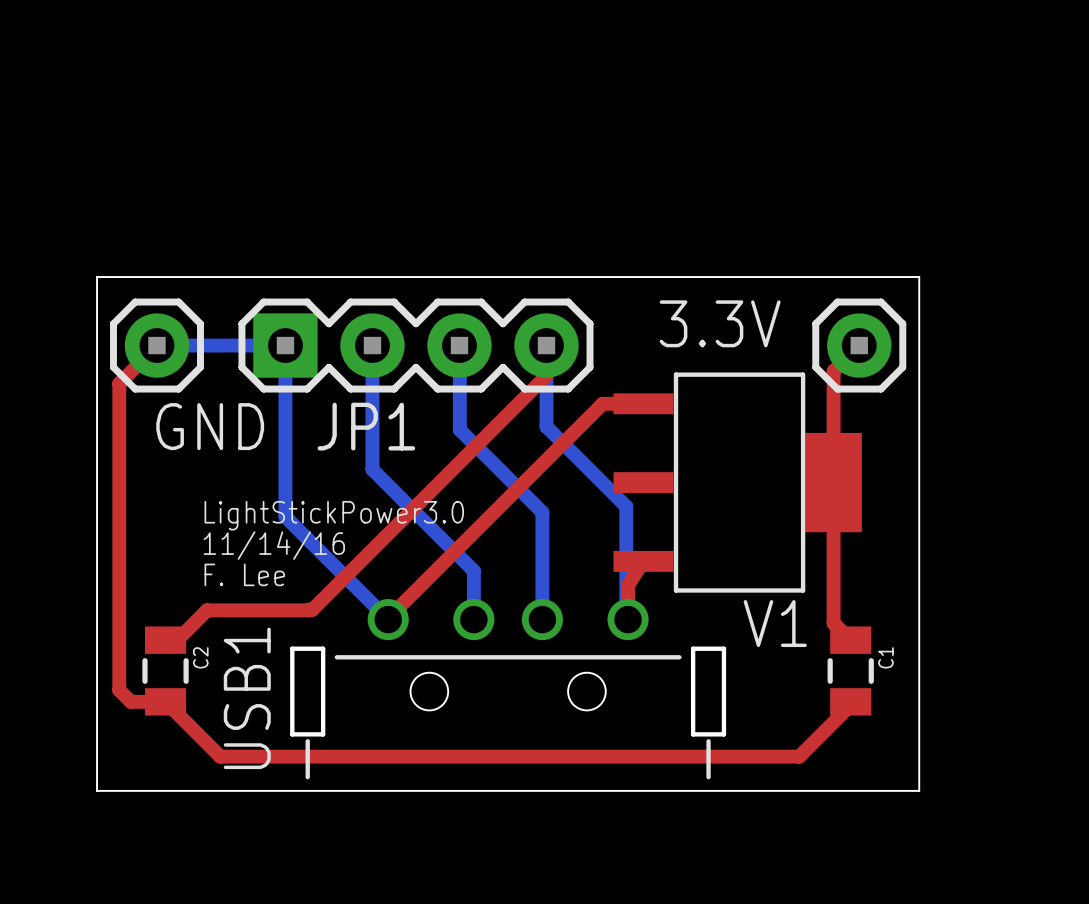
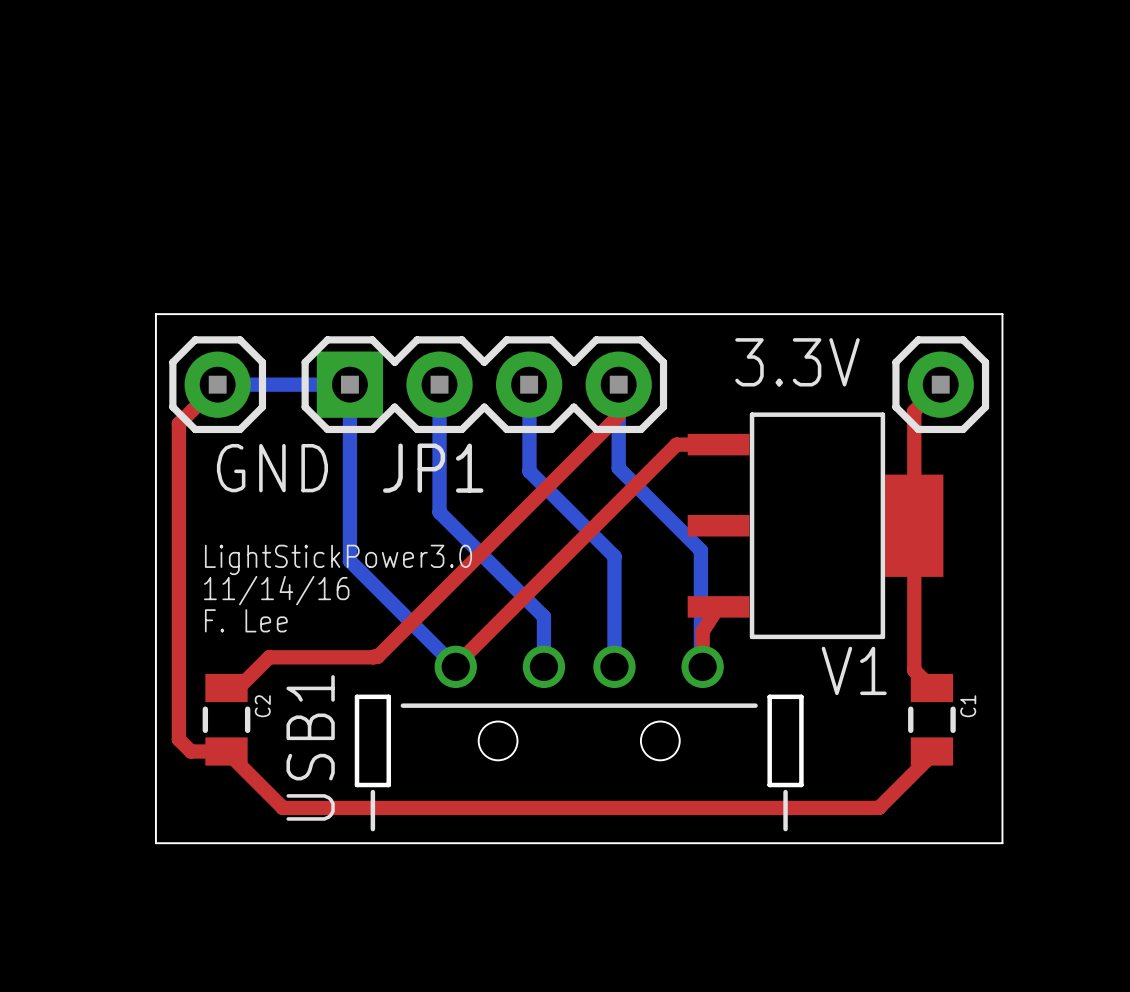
text position: LightStickPower3.0 (334, 515) -> LightStickPower3.0 (338, 559)
text position: 11/14/16 (274, 545) -> 11/14/16 (276, 590)
text position: F. Lee (244, 574) -> F. Lee (246, 620)

